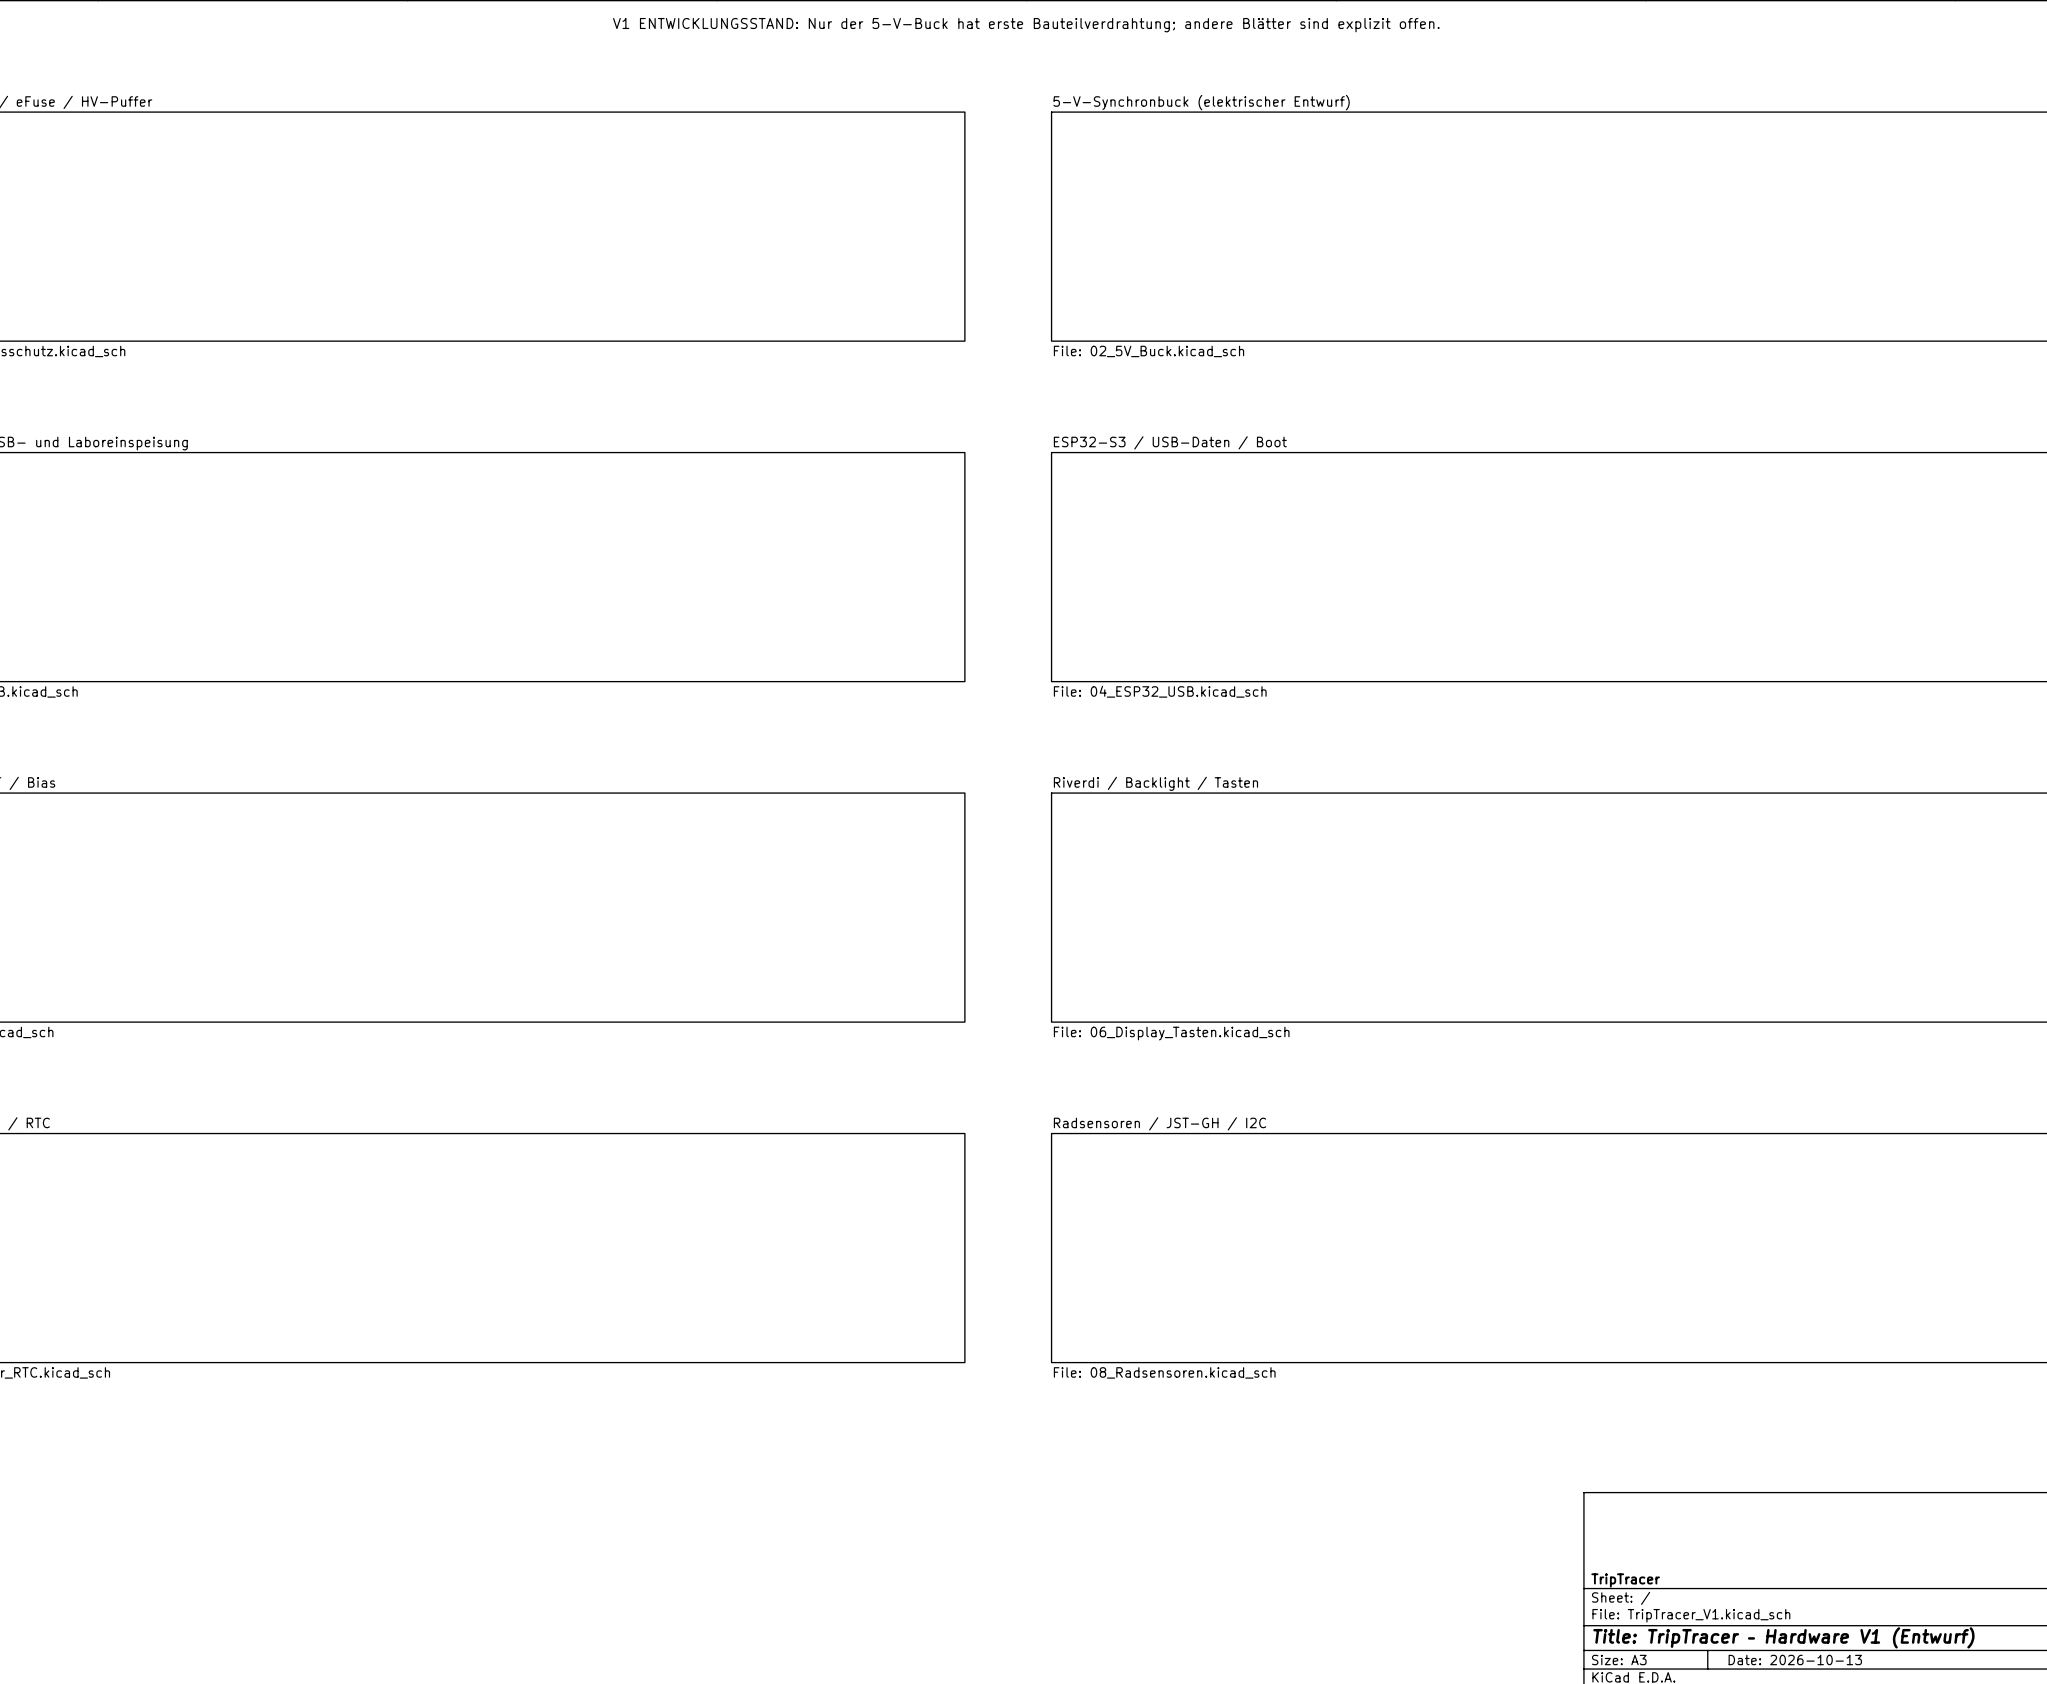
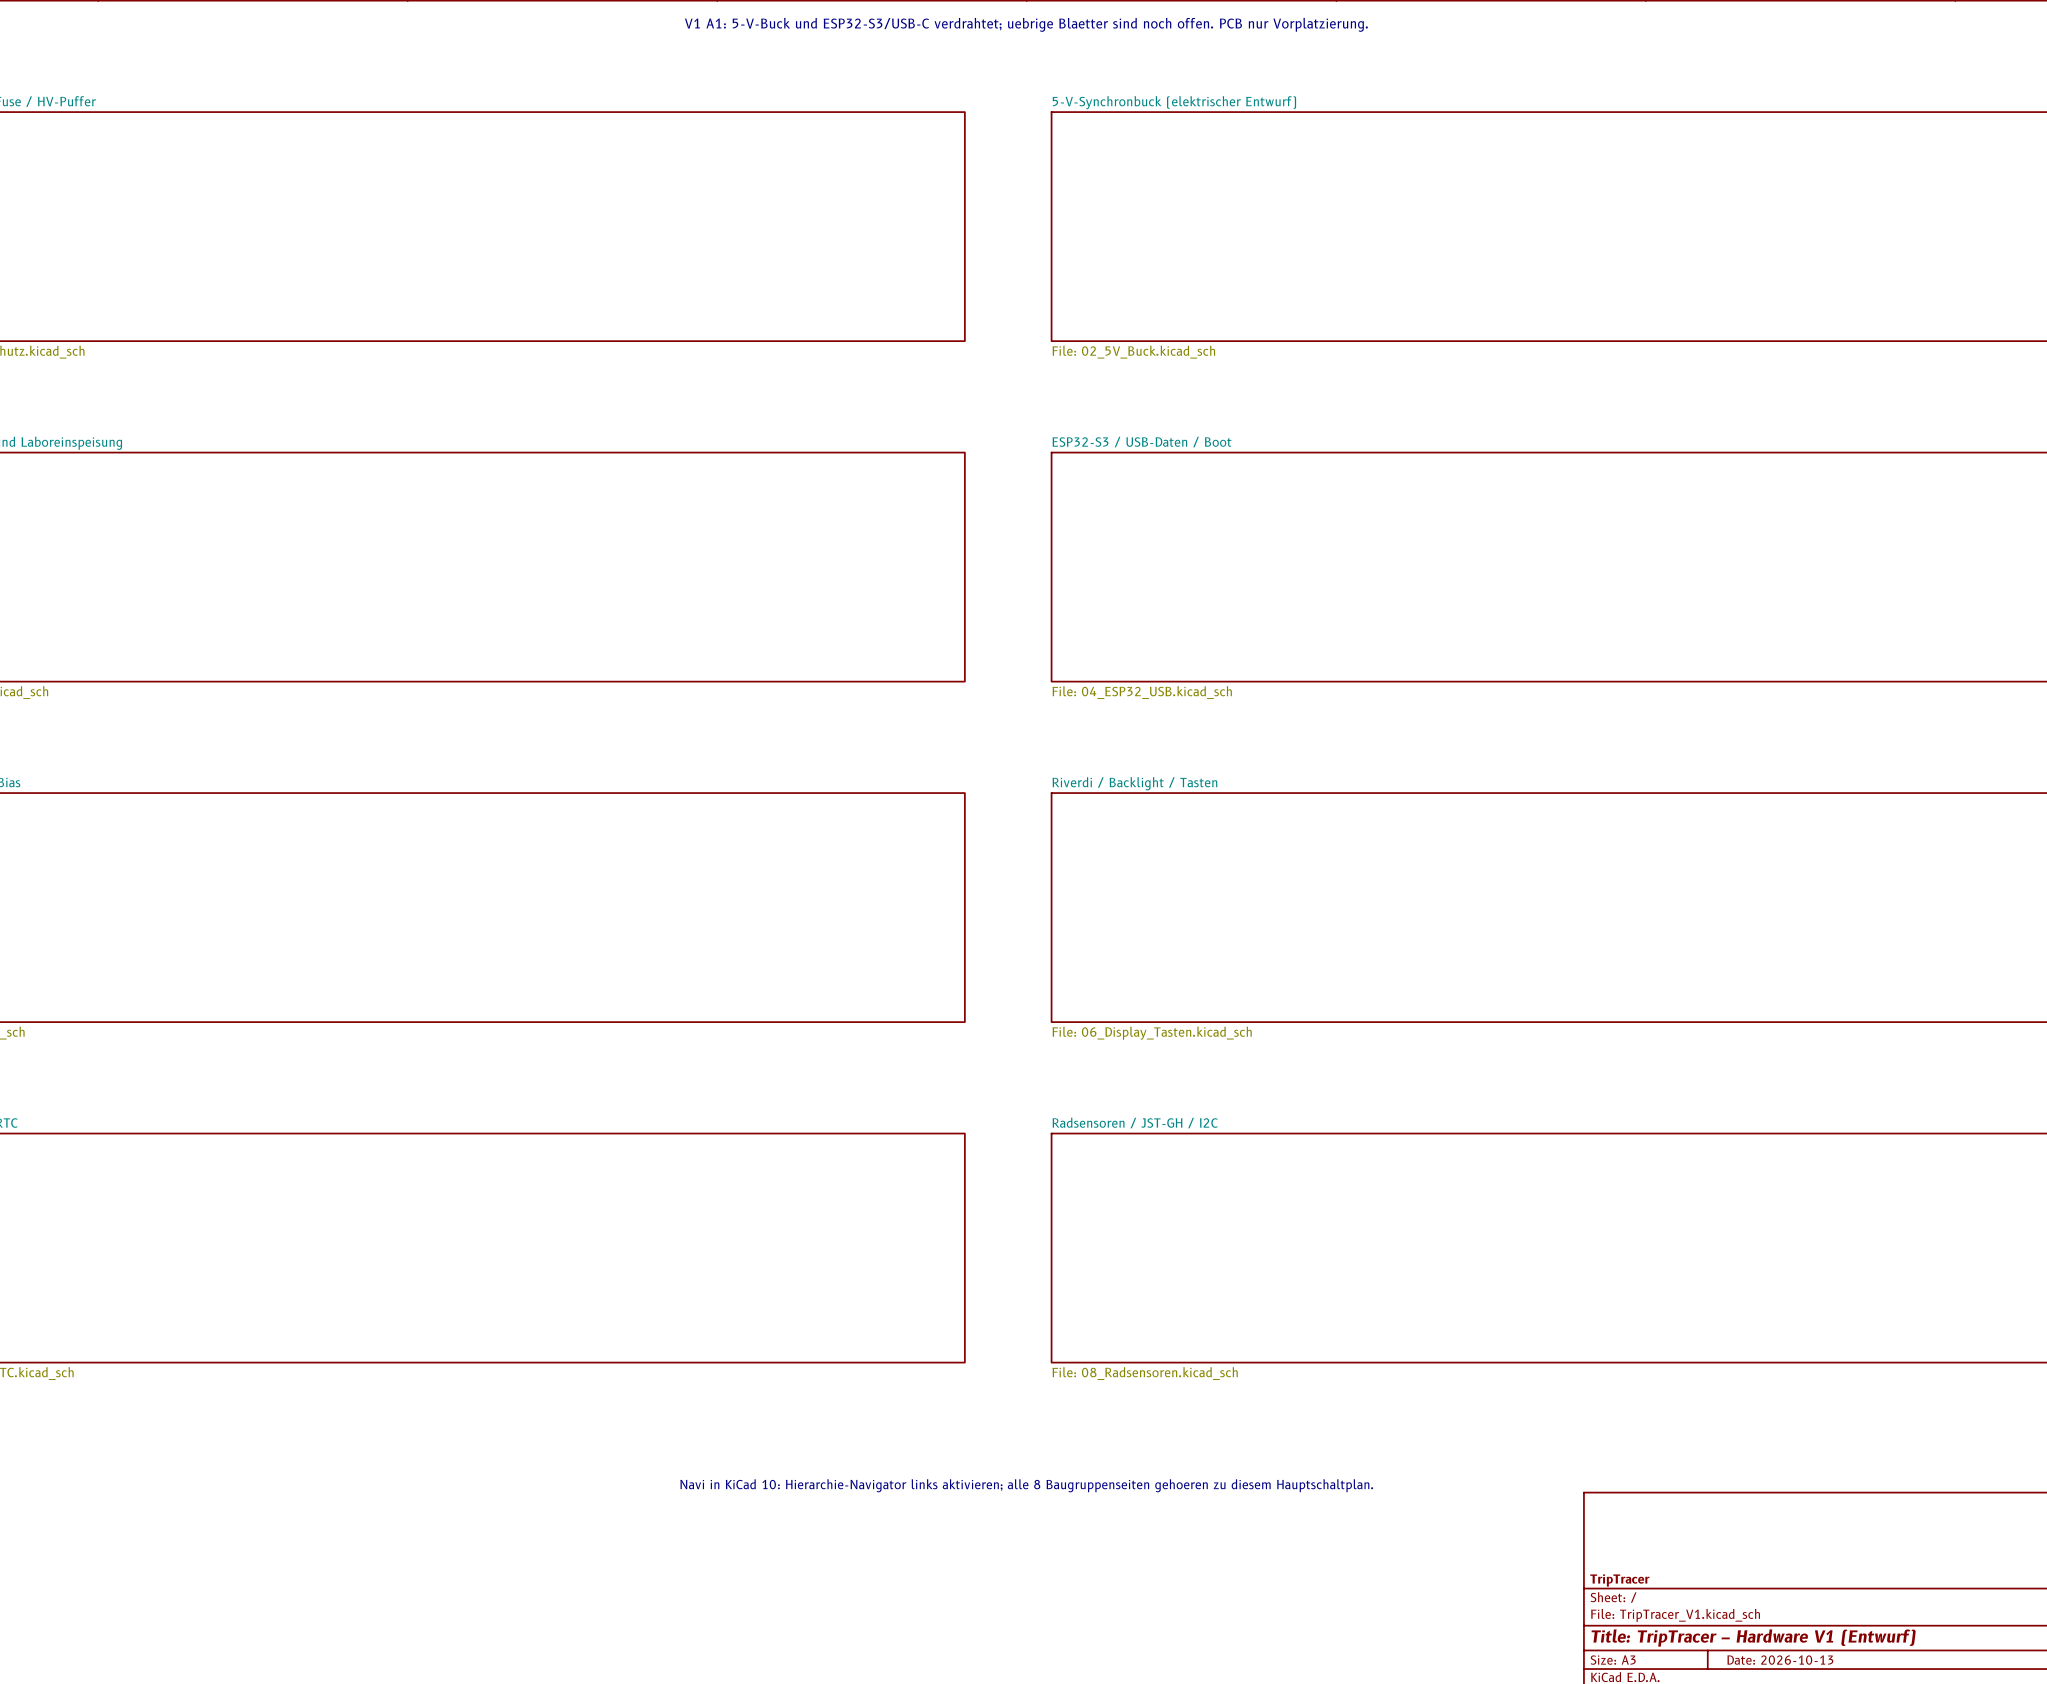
text: V1 ENTWICKLUNGSSTAND: Nur der 5-V-Buck hat erste Bauteilverdrahtung; andere Blätter sind explizit offen. (1026, 25) -> V1 A1: 5-V-Buck und ESP32-S3/USB-C verdrahtet; uebrige Blaetter sind noch offen. PCB nur Vorplatzierung. (1026, 24)
text: none -> Navi in KiCad 10: Hierarchie-Navigator links aktivieren; alle 8 Baugruppenseiten gehoeren zu diesem Hauptschaltplan. (1026, 1485)

